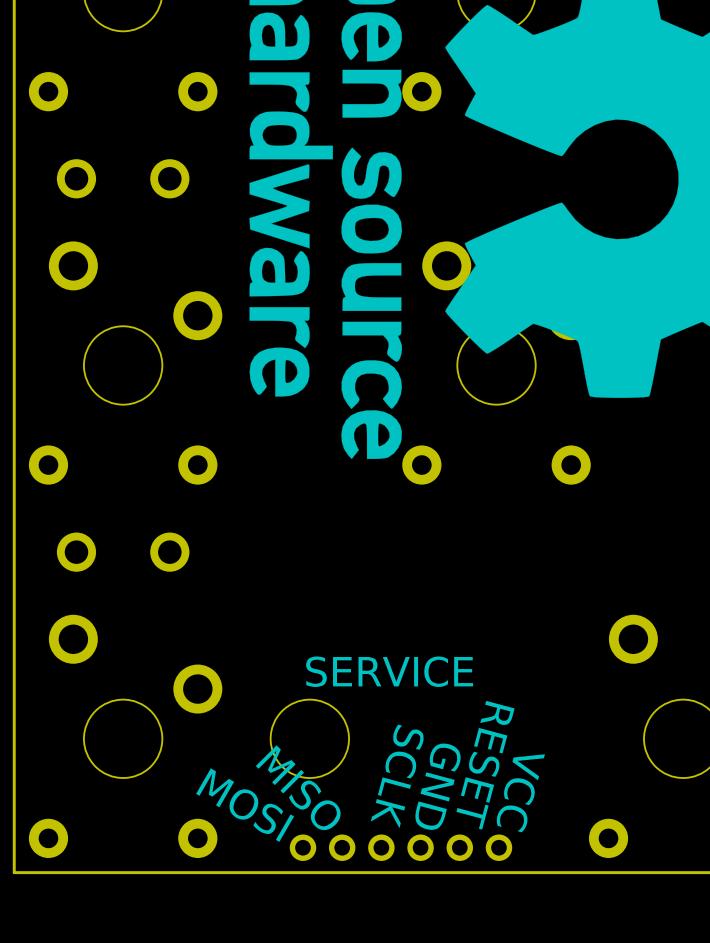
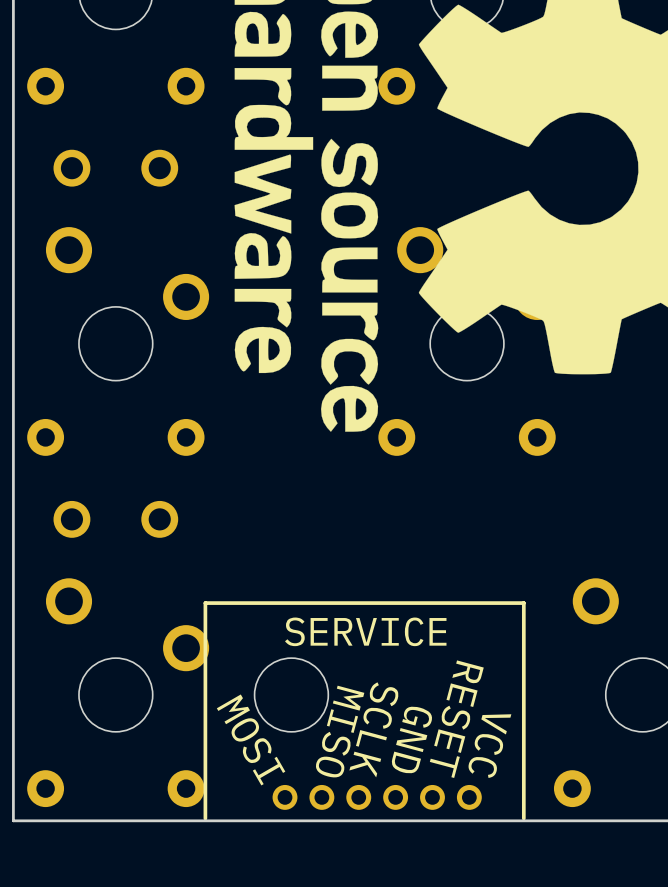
text rotation: 0° (298, 787) -> 60° clockwise (340, 731)
text rotation: 0° (245, 805) -> 30° clockwise (251, 739)
line: none -> (523, 818) (523, 603) (205, 603) (205, 818)

